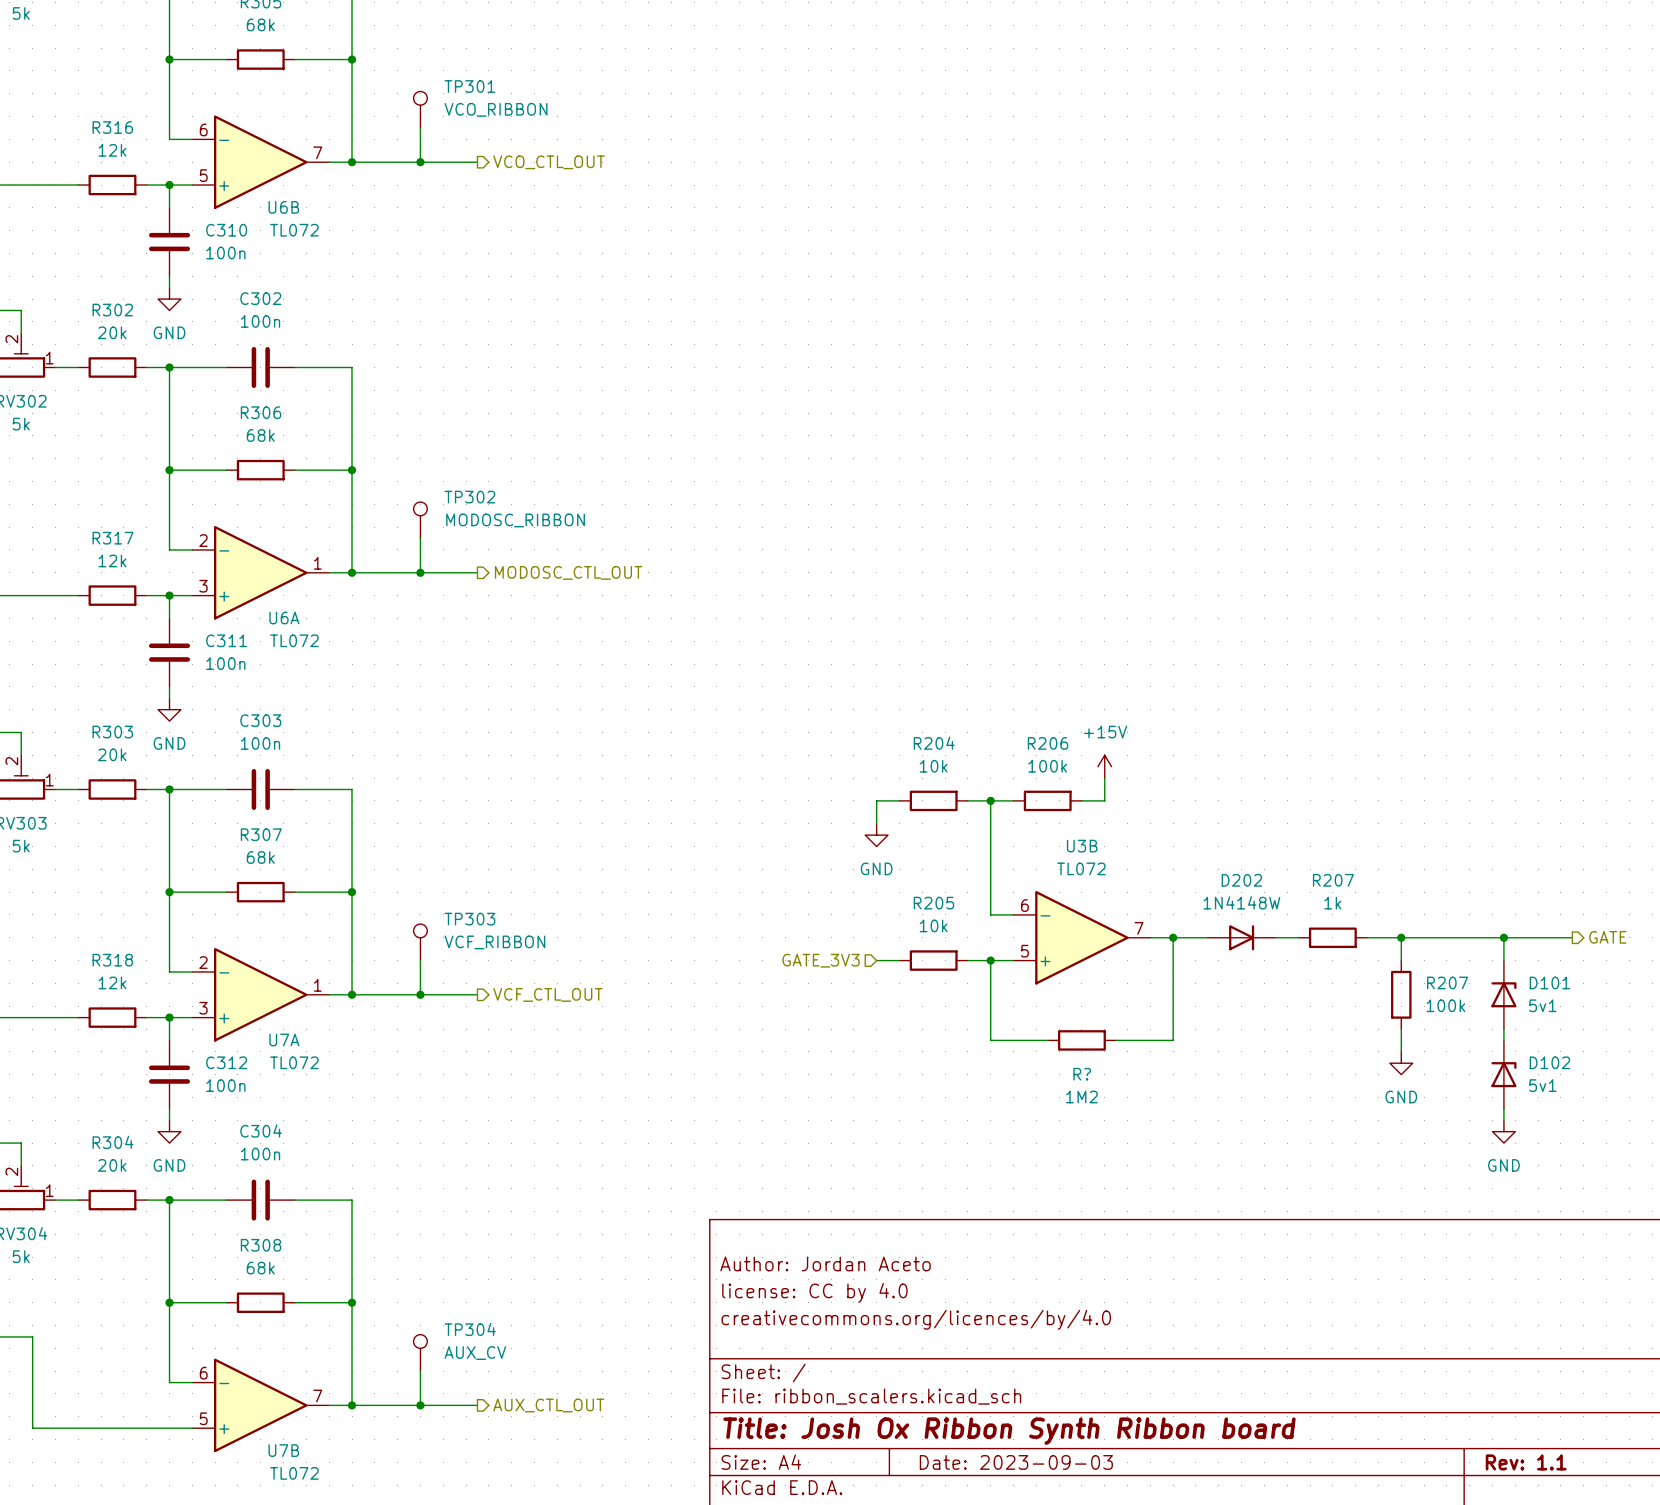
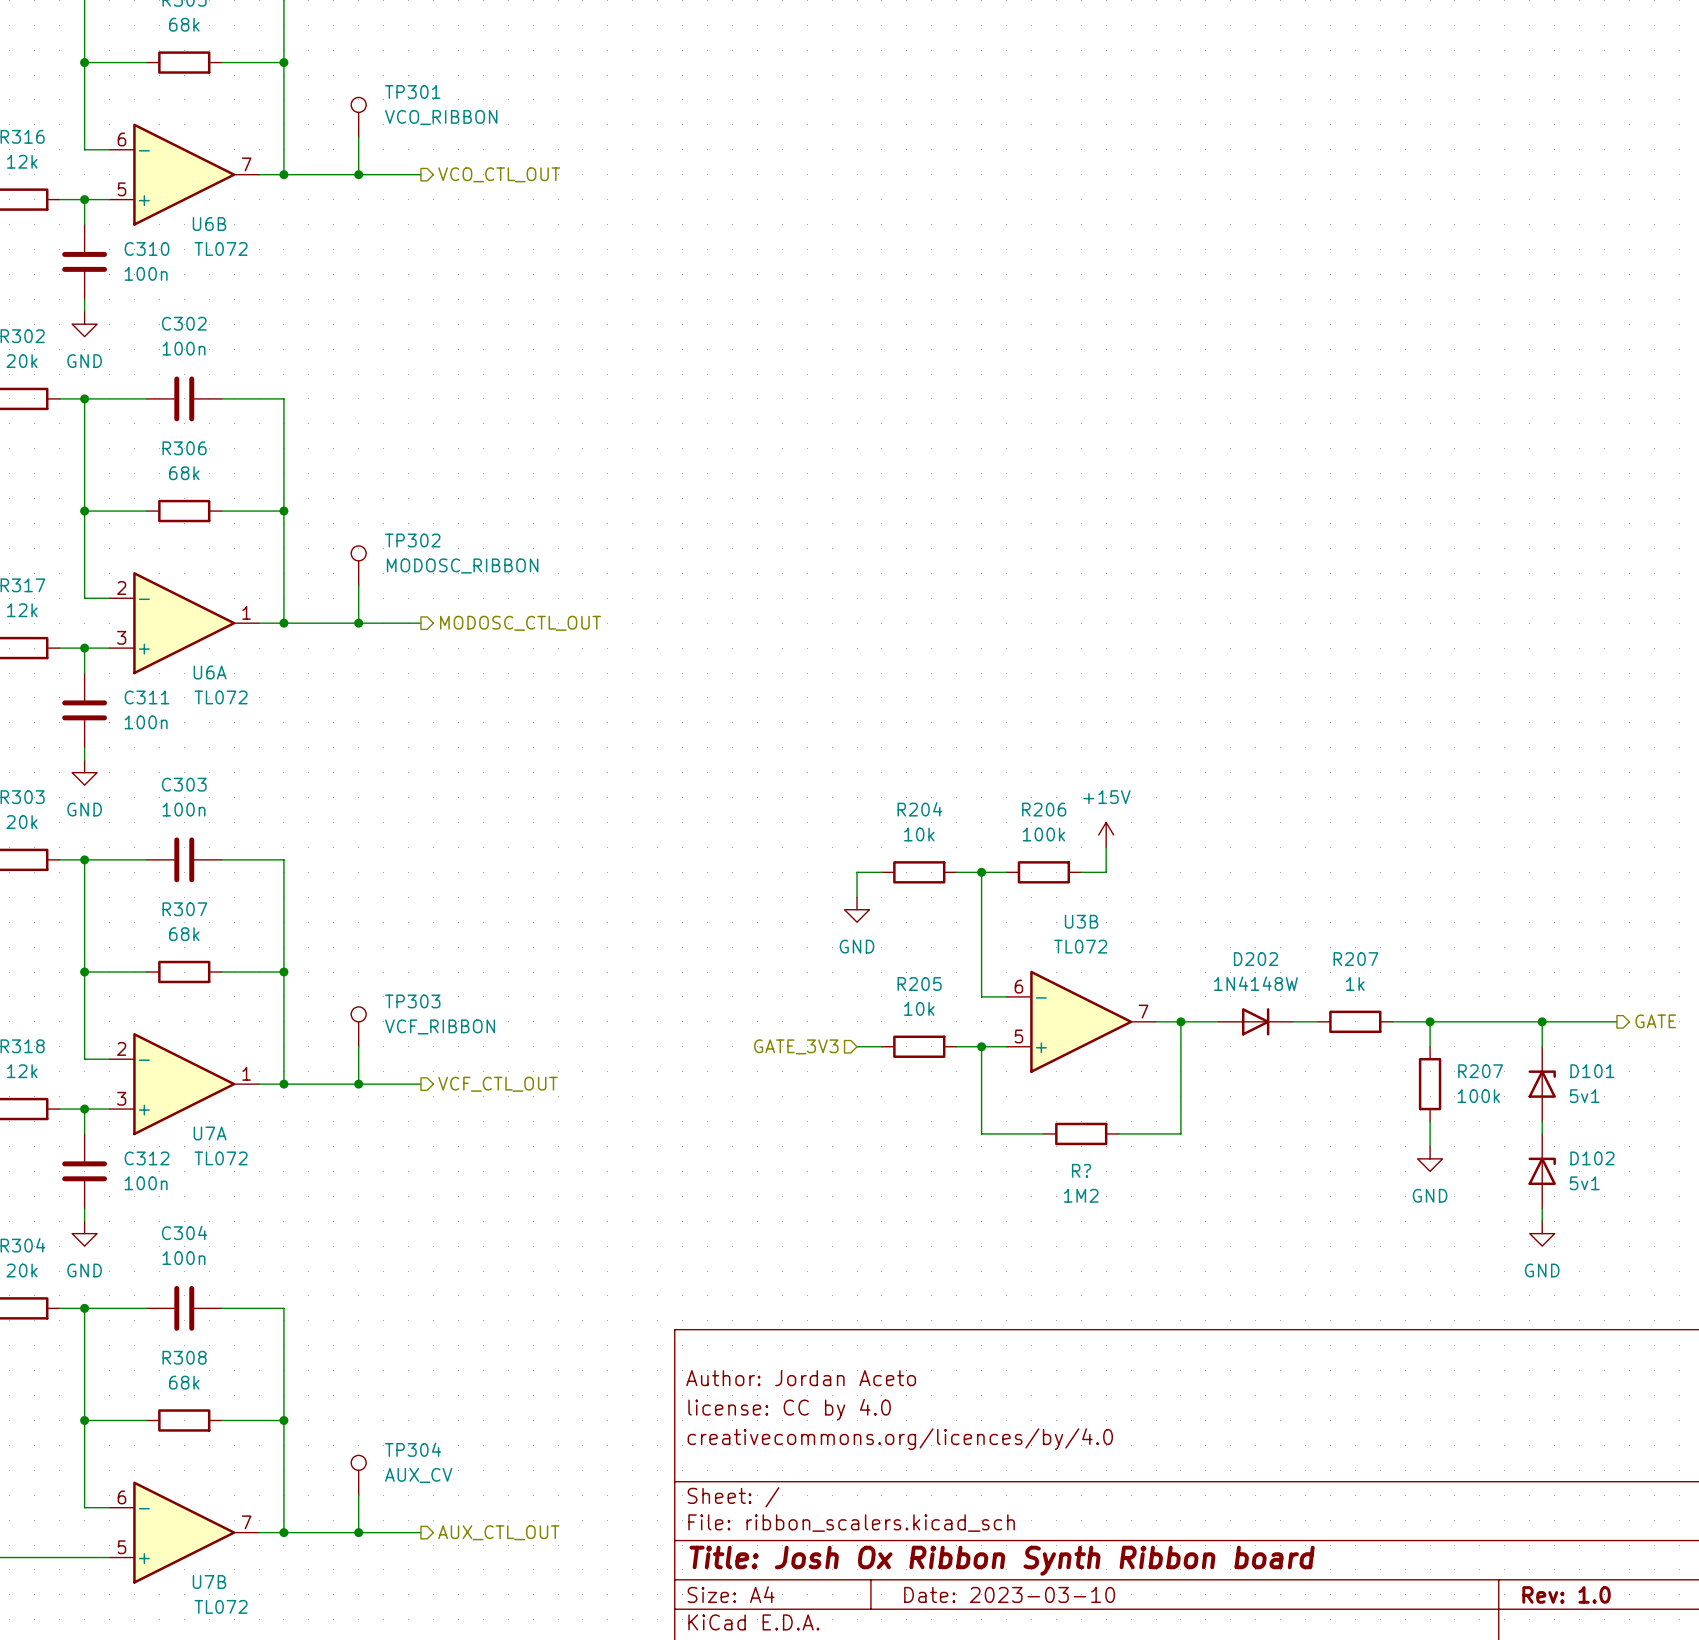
title block: Date: 2023-09-03 (1016, 1462) -> Date: 2023-03-10 (1009, 1594)
title block: Rev: 1.1 (1526, 1462) -> Rev: 1.0 (1566, 1594)

